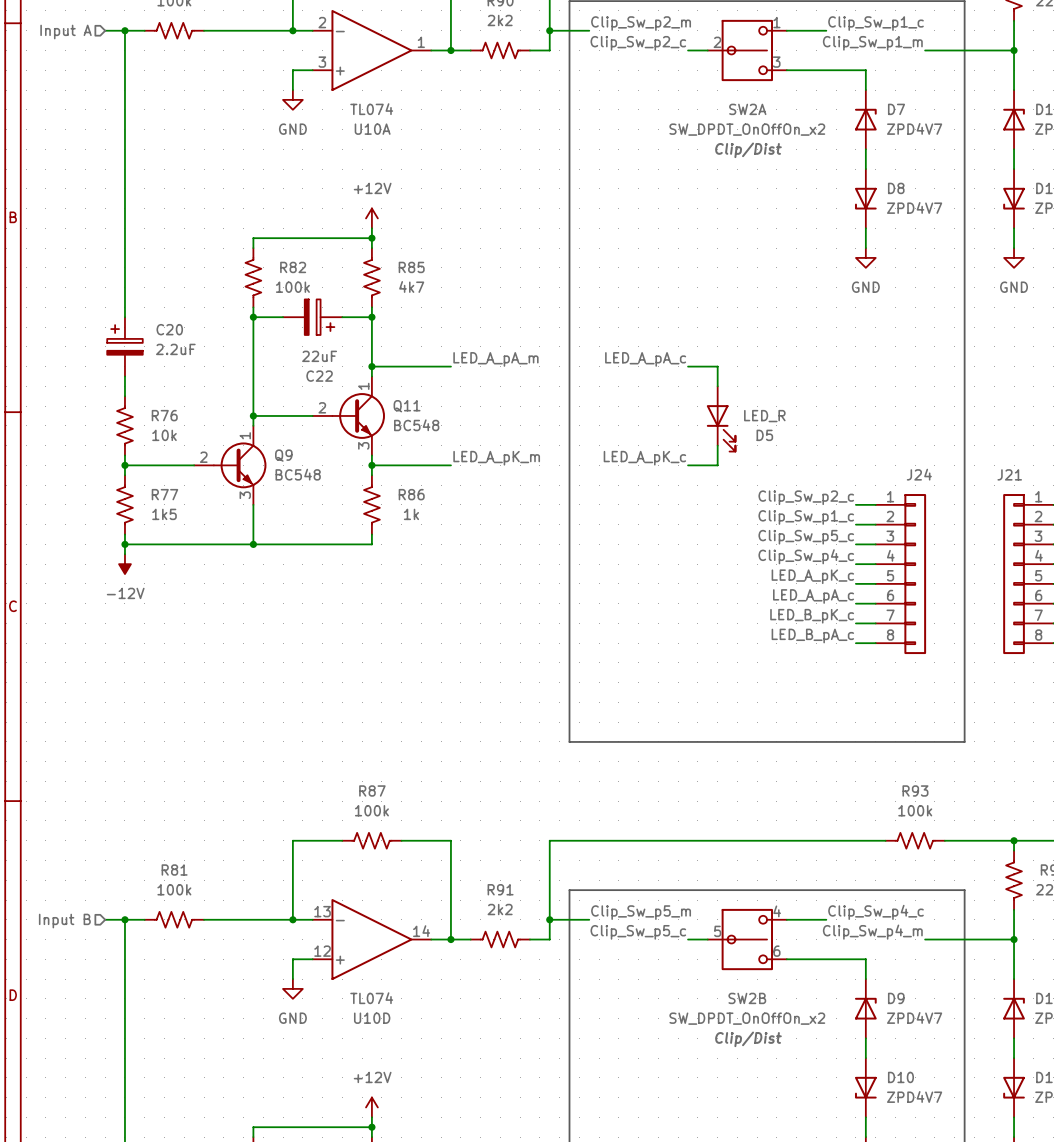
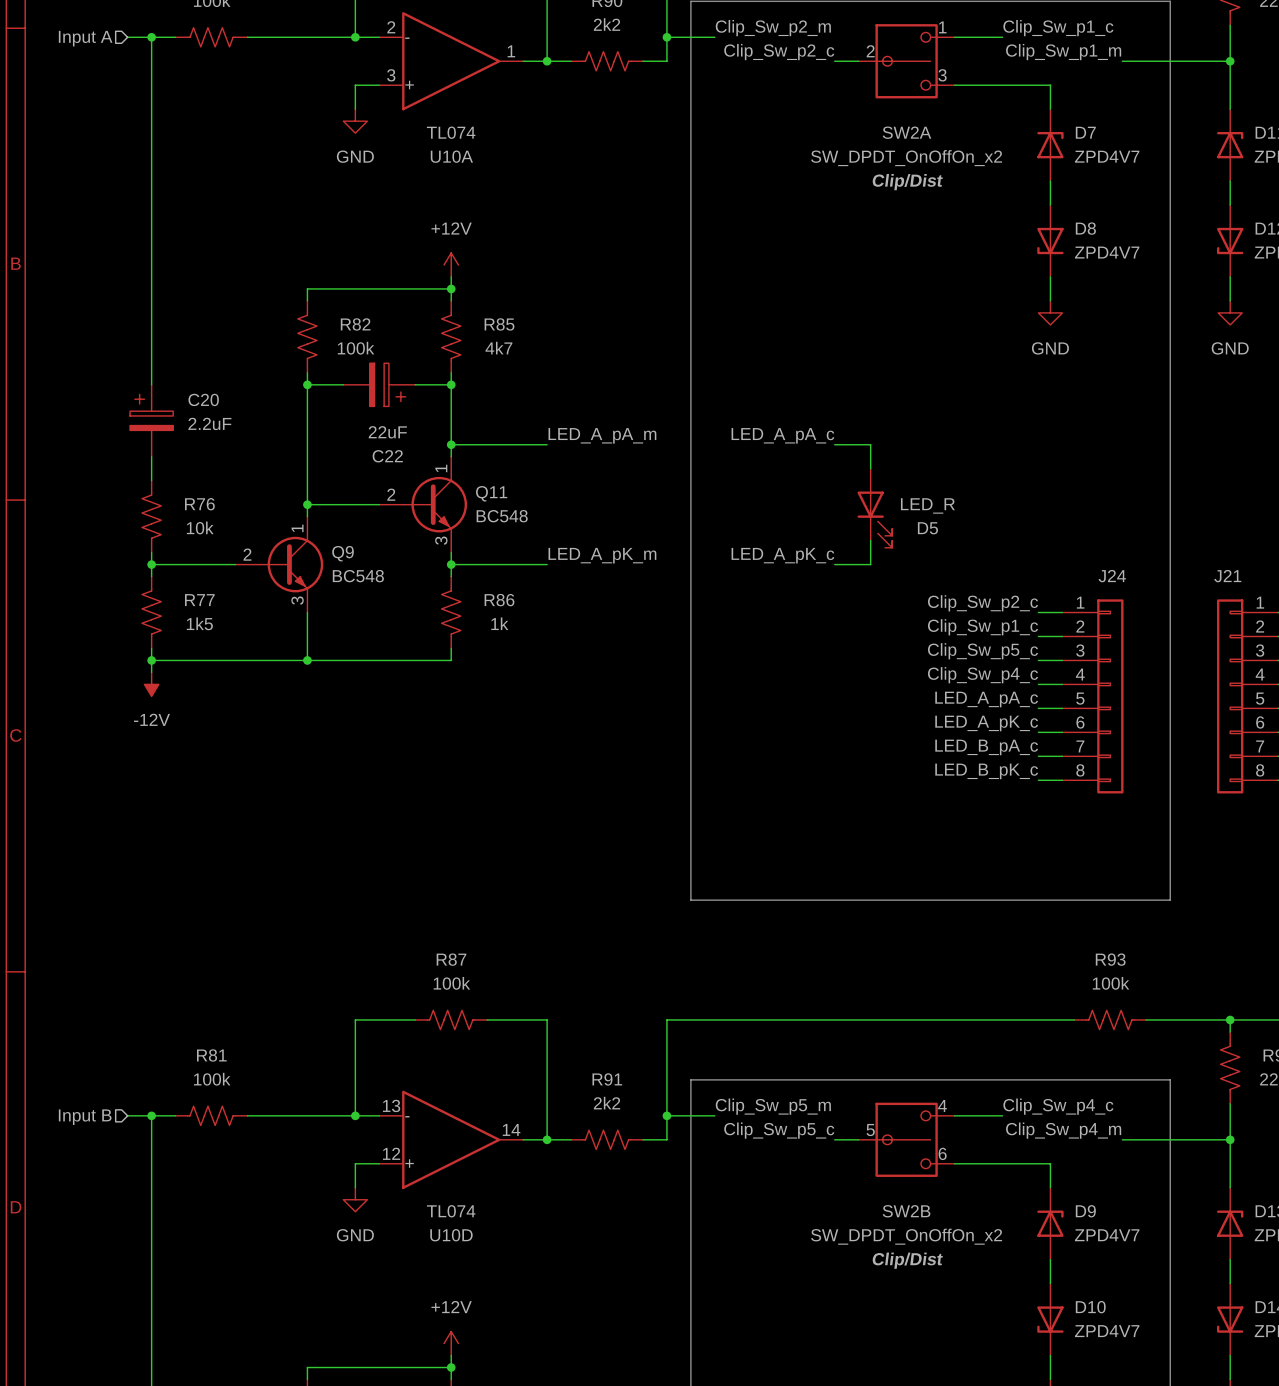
label: LED_A_pK_c (812, 576) -> LED_A_pA_c (986, 699)
label: LED_A_pA_c (813, 596) -> LED_A_pK_c (986, 723)
label: LED_B_pK_c (812, 616) -> LED_B_pA_c (986, 747)
label: LED_B_pA_c (812, 636) -> LED_B_pK_c (986, 771)

